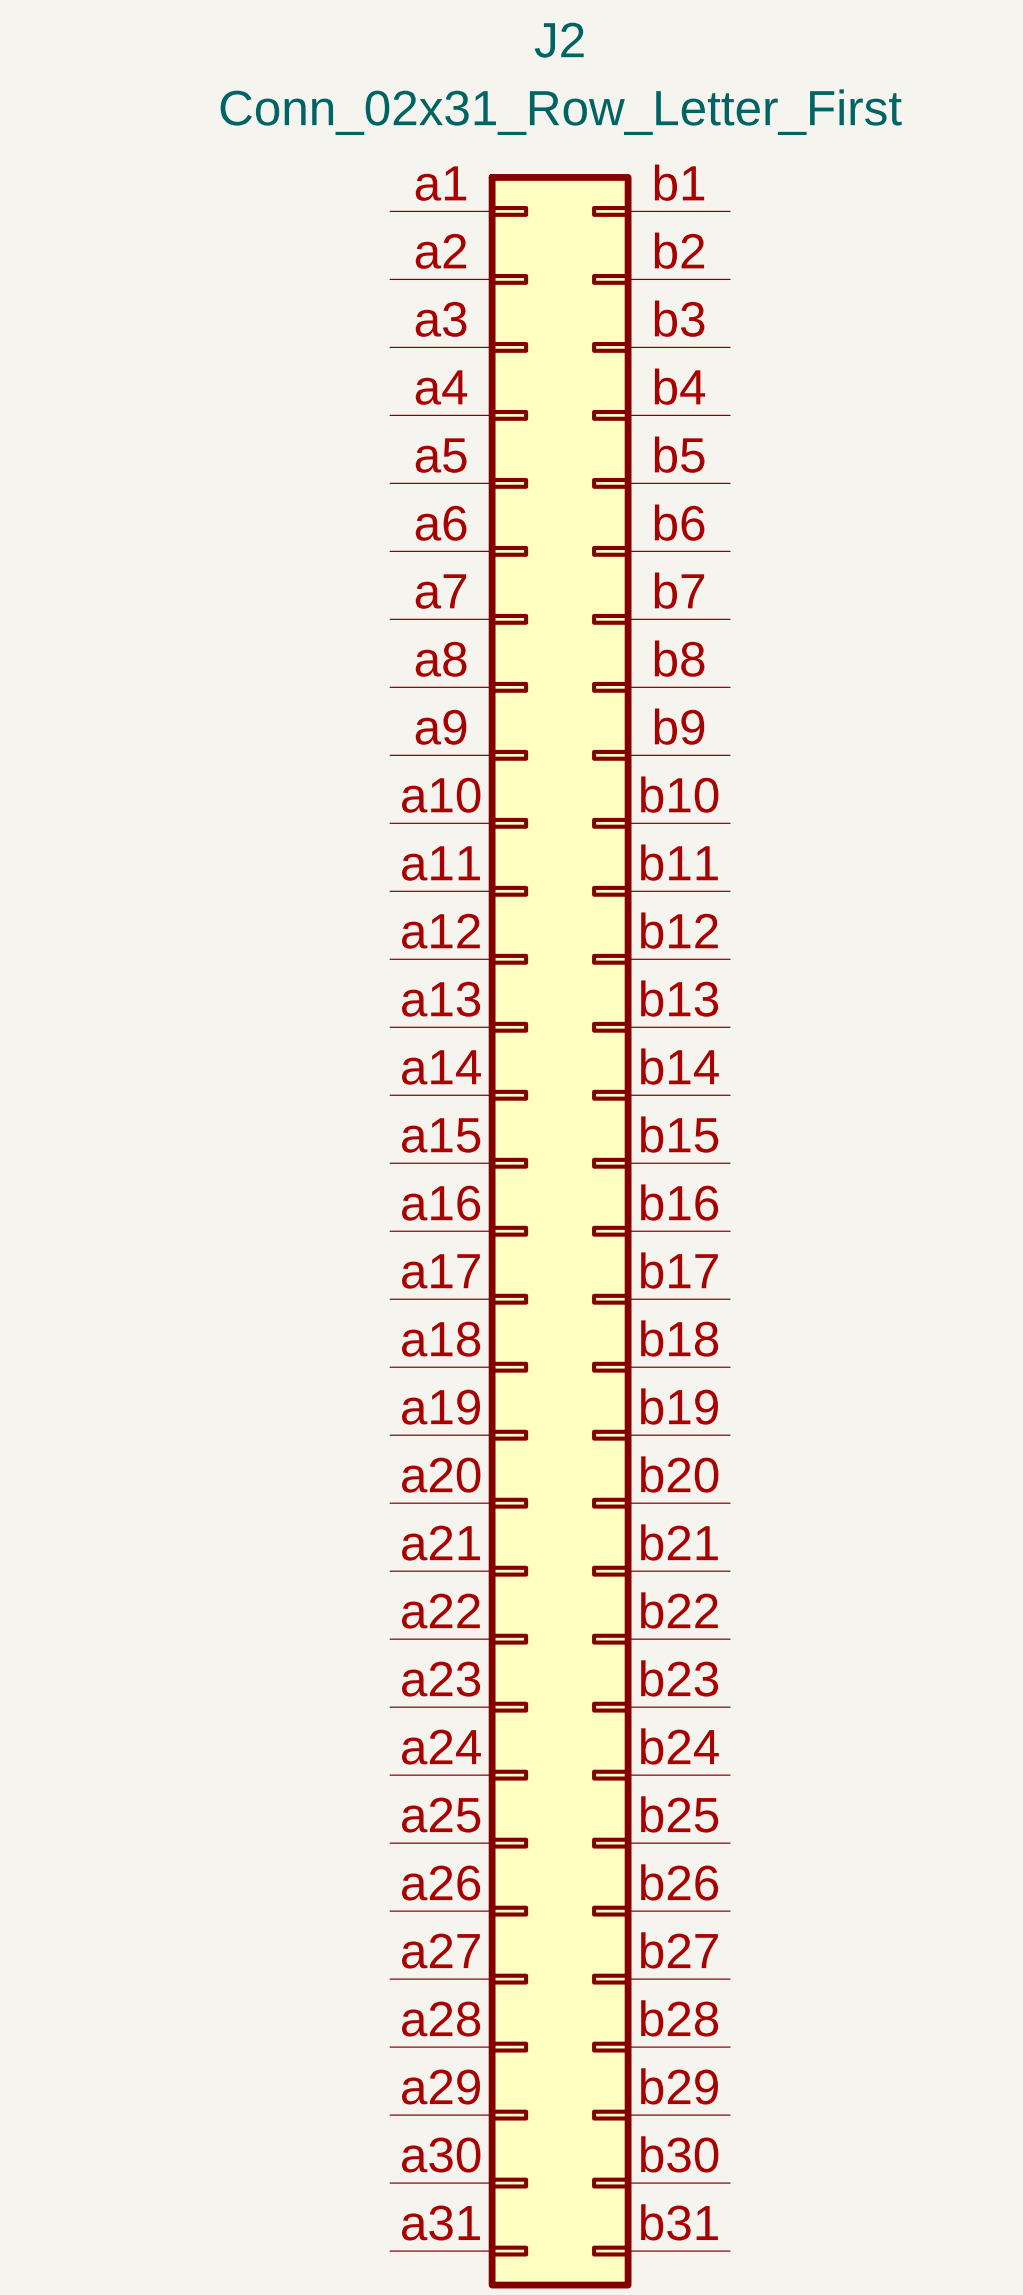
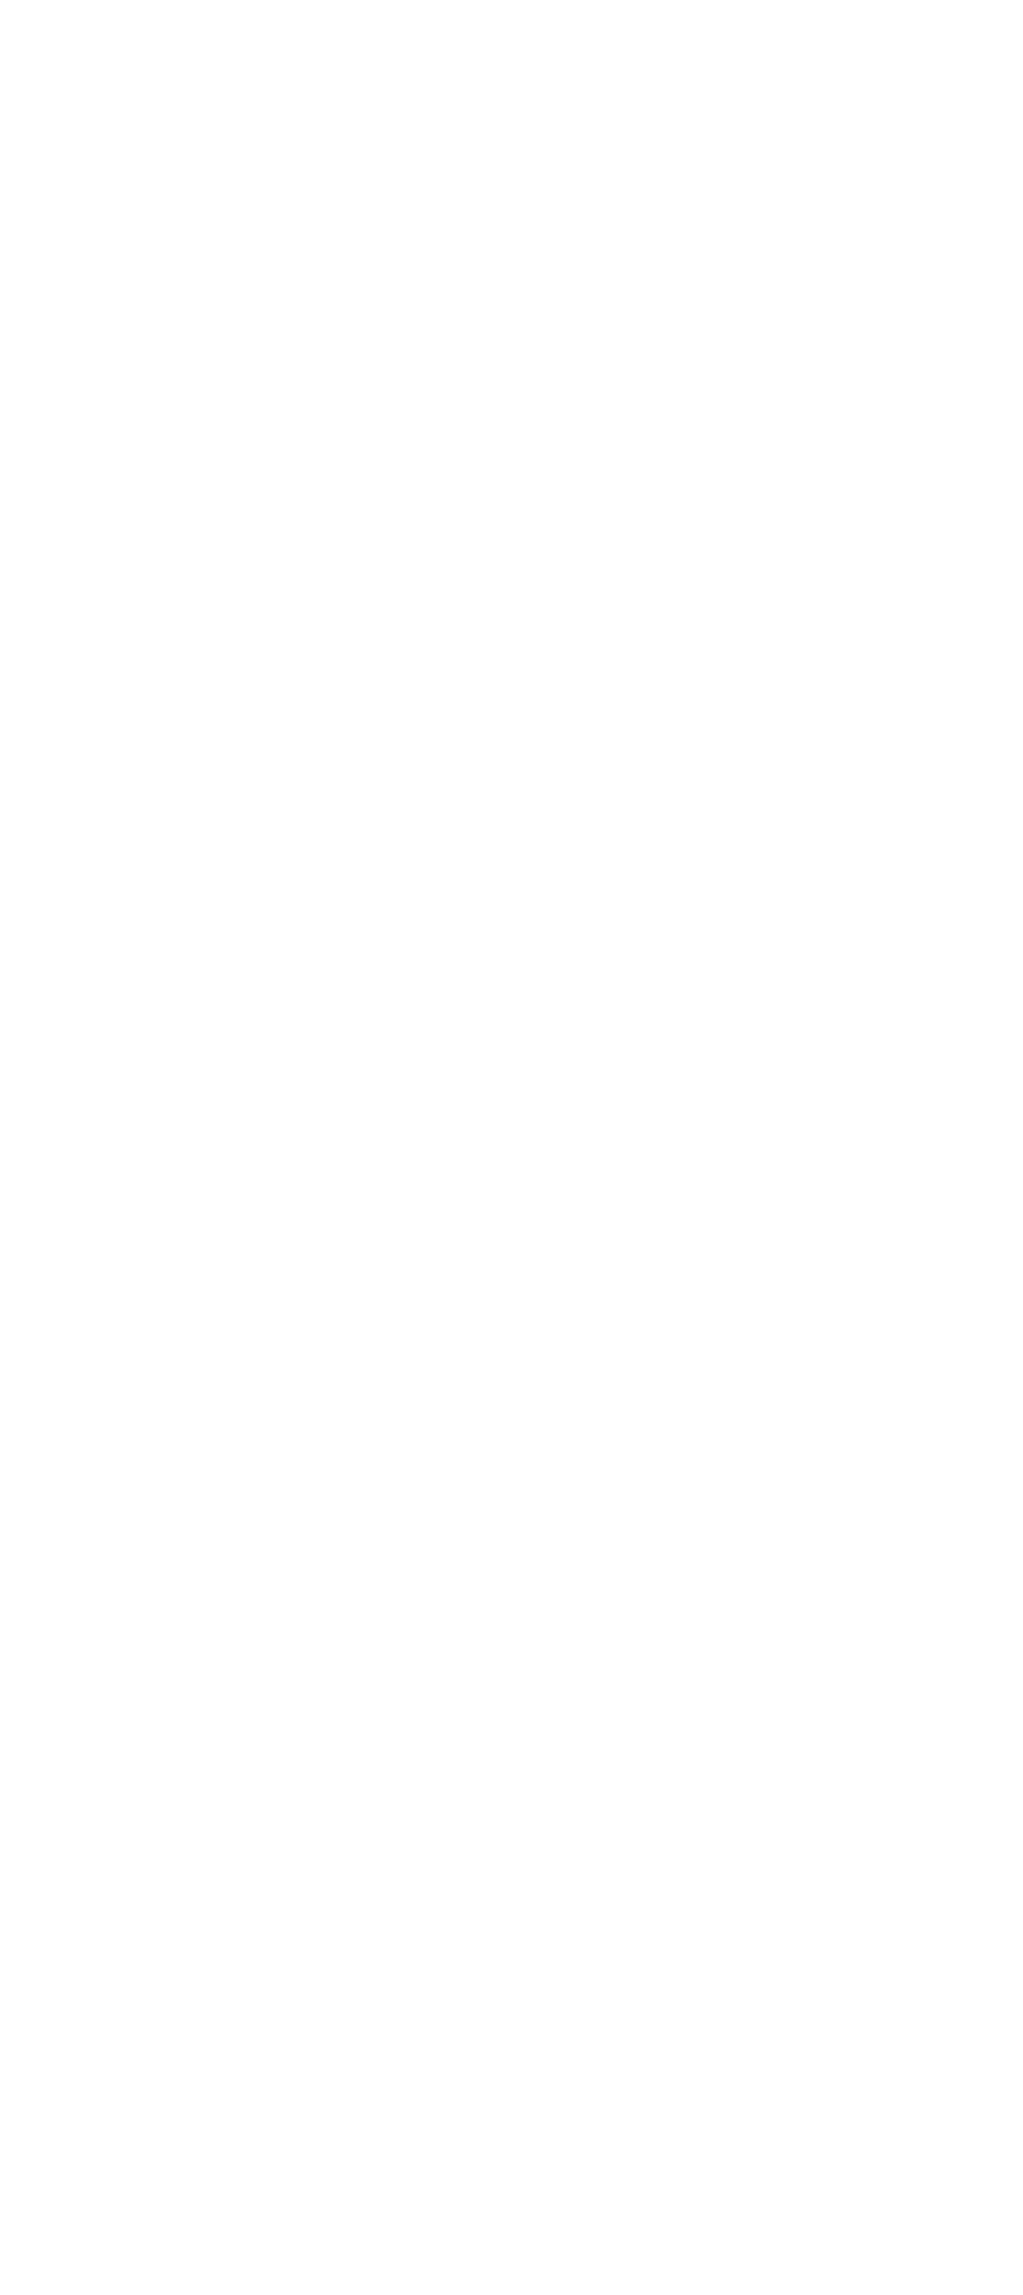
J2: Conn_02x31_Row_Letter_First (560, 1231) -> none

